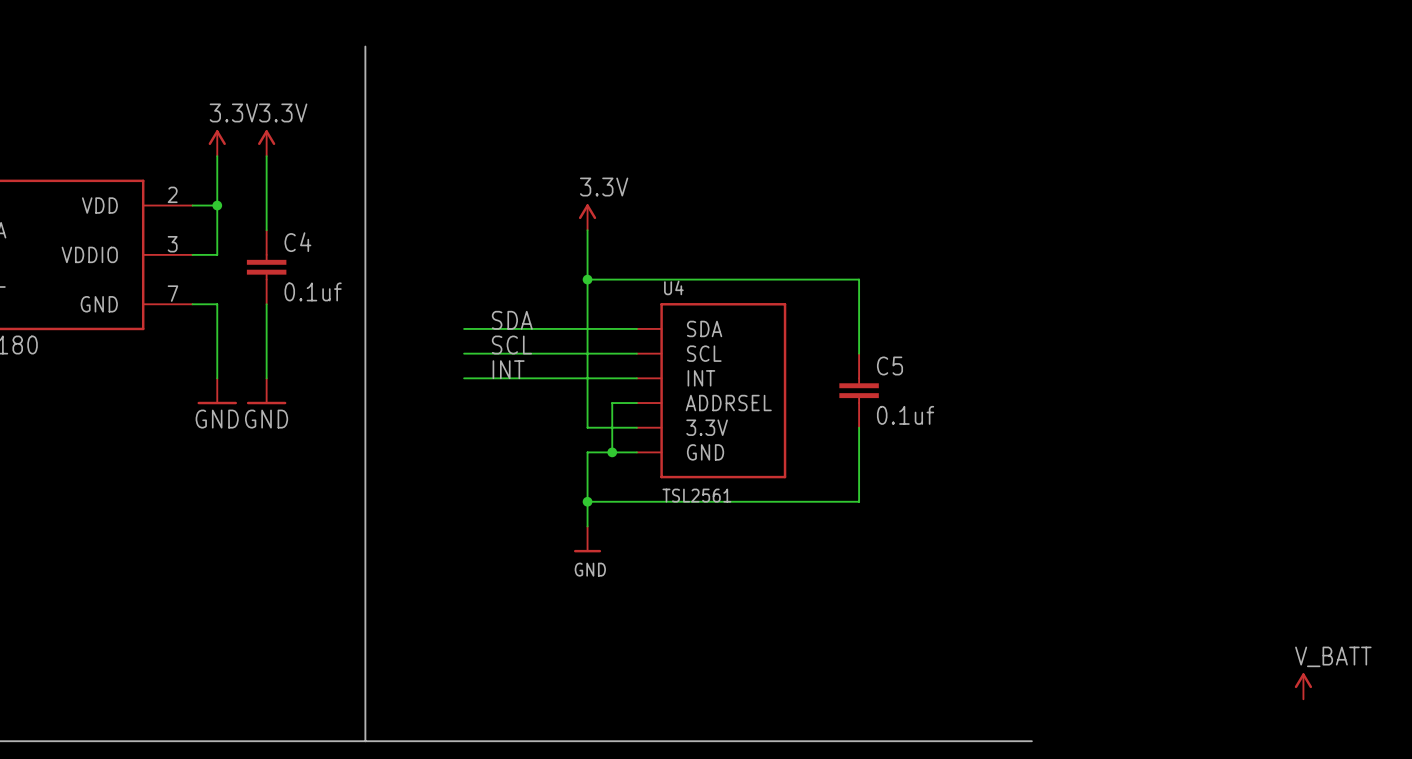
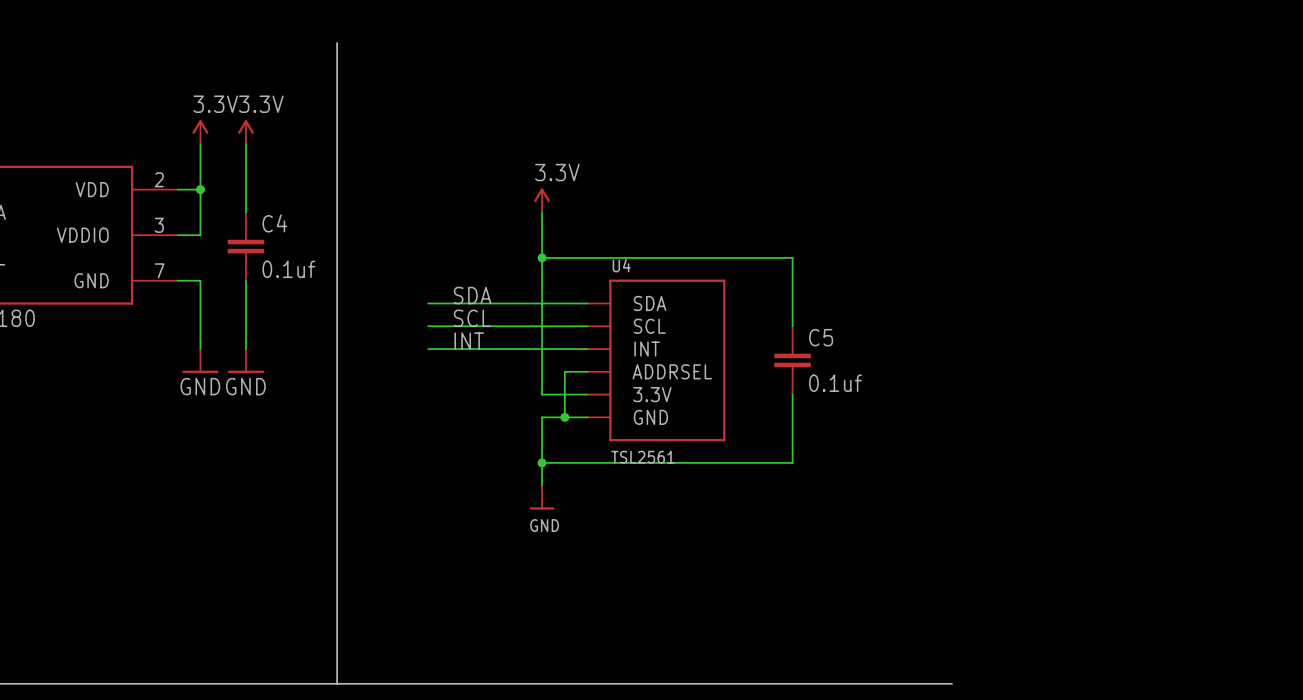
power symbol: V_BATT (1303, 686) -> none

